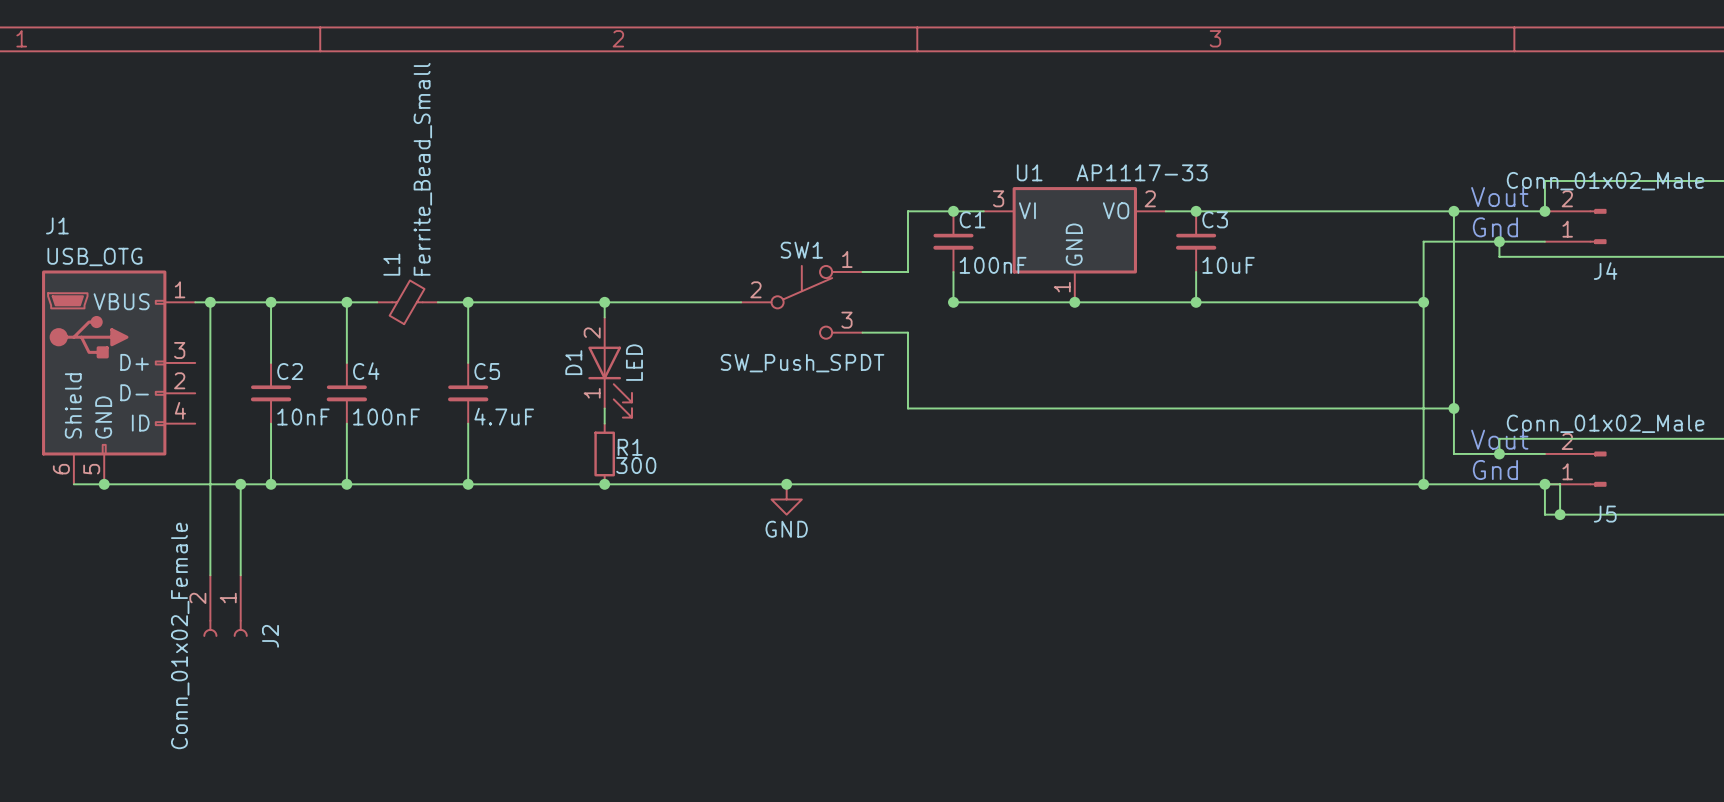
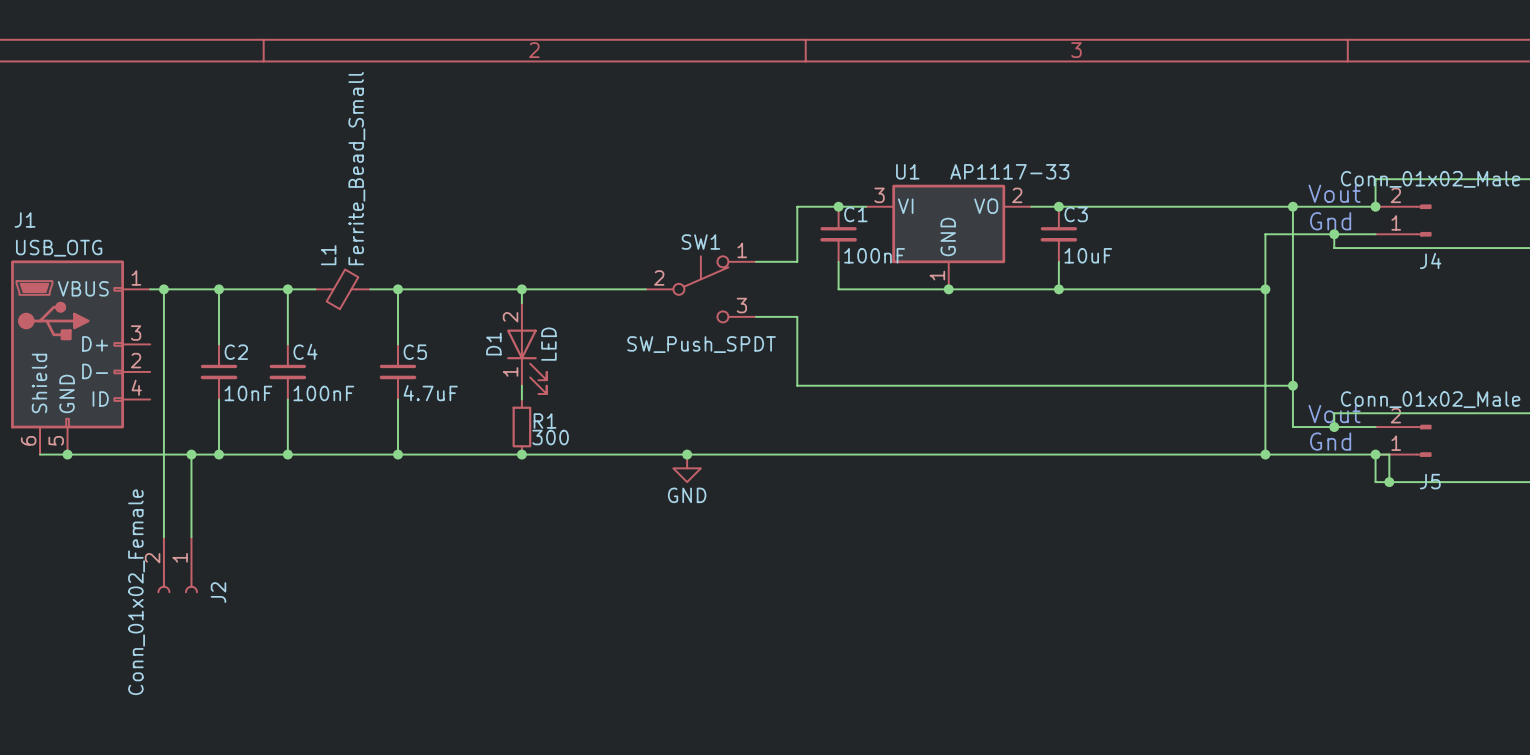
junction: (953, 302) -> none

